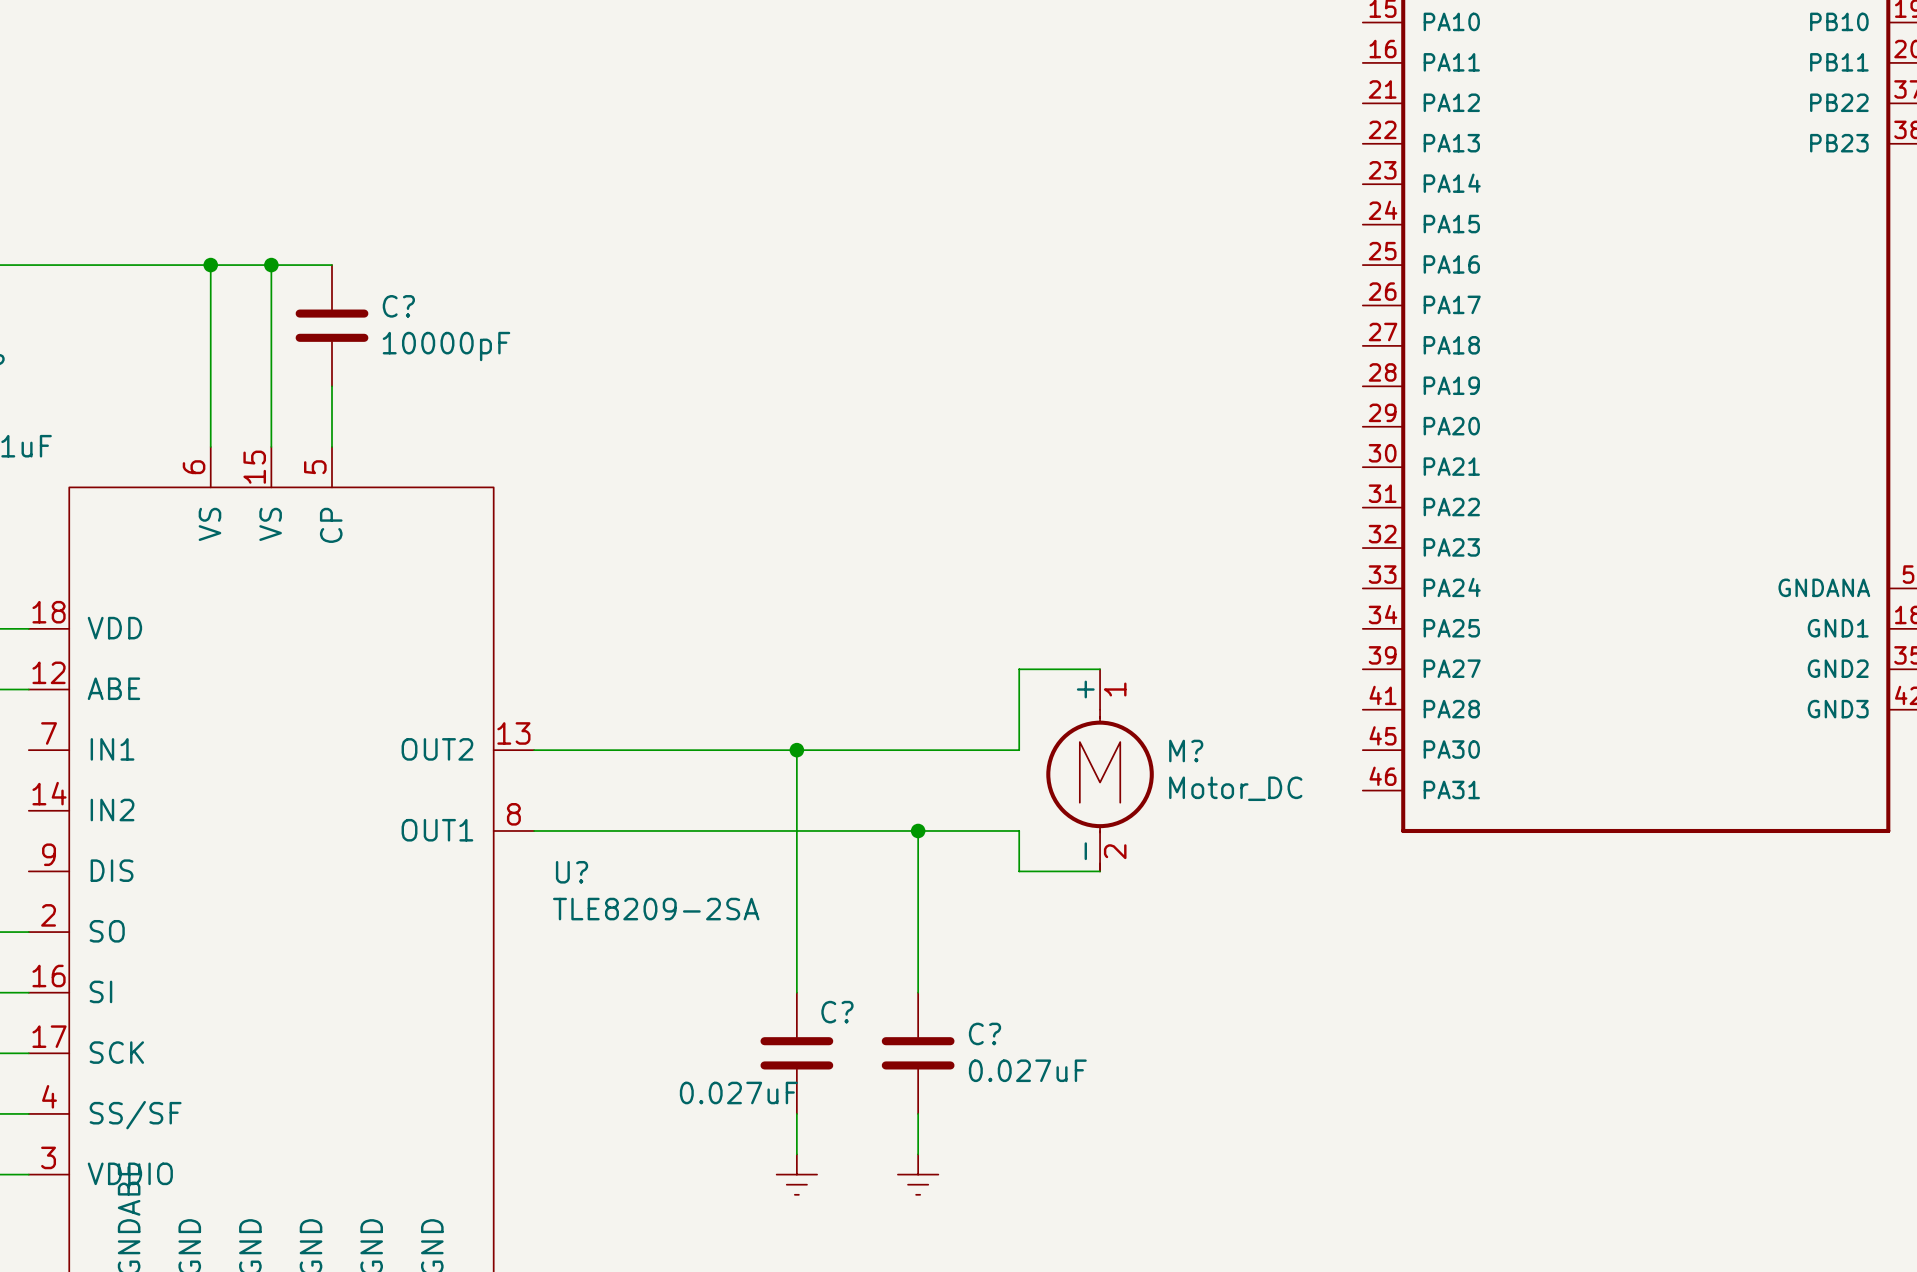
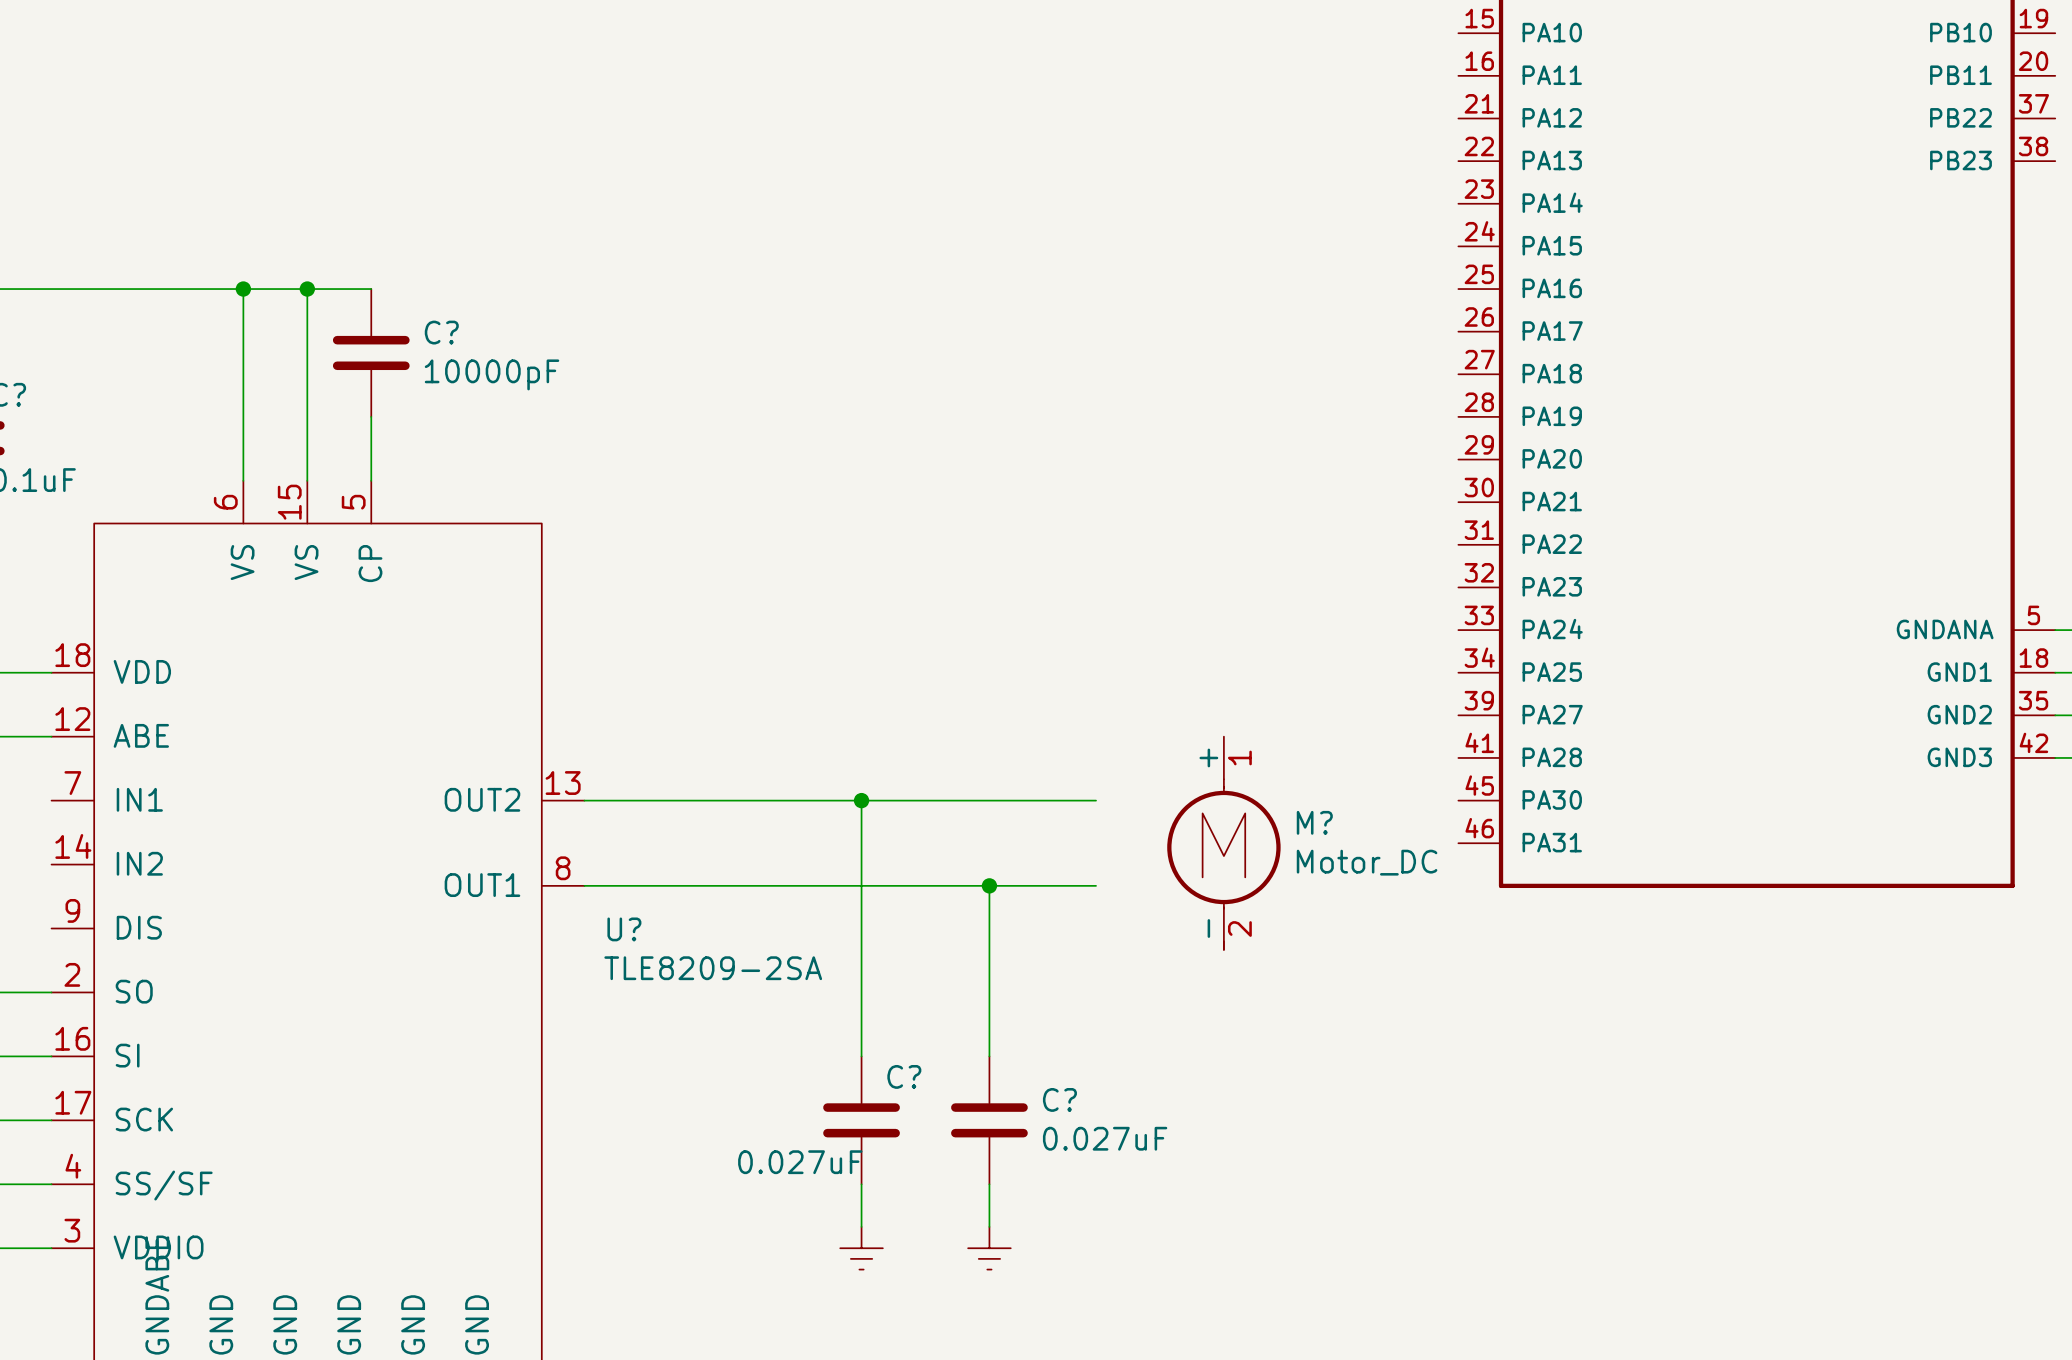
wire: (1100, 669) (1019, 669) (1019, 750) -> none
M? position: (1100, 770) -> (1223, 843)
wire: (1019, 830) (1019, 871) (1100, 871) -> none

